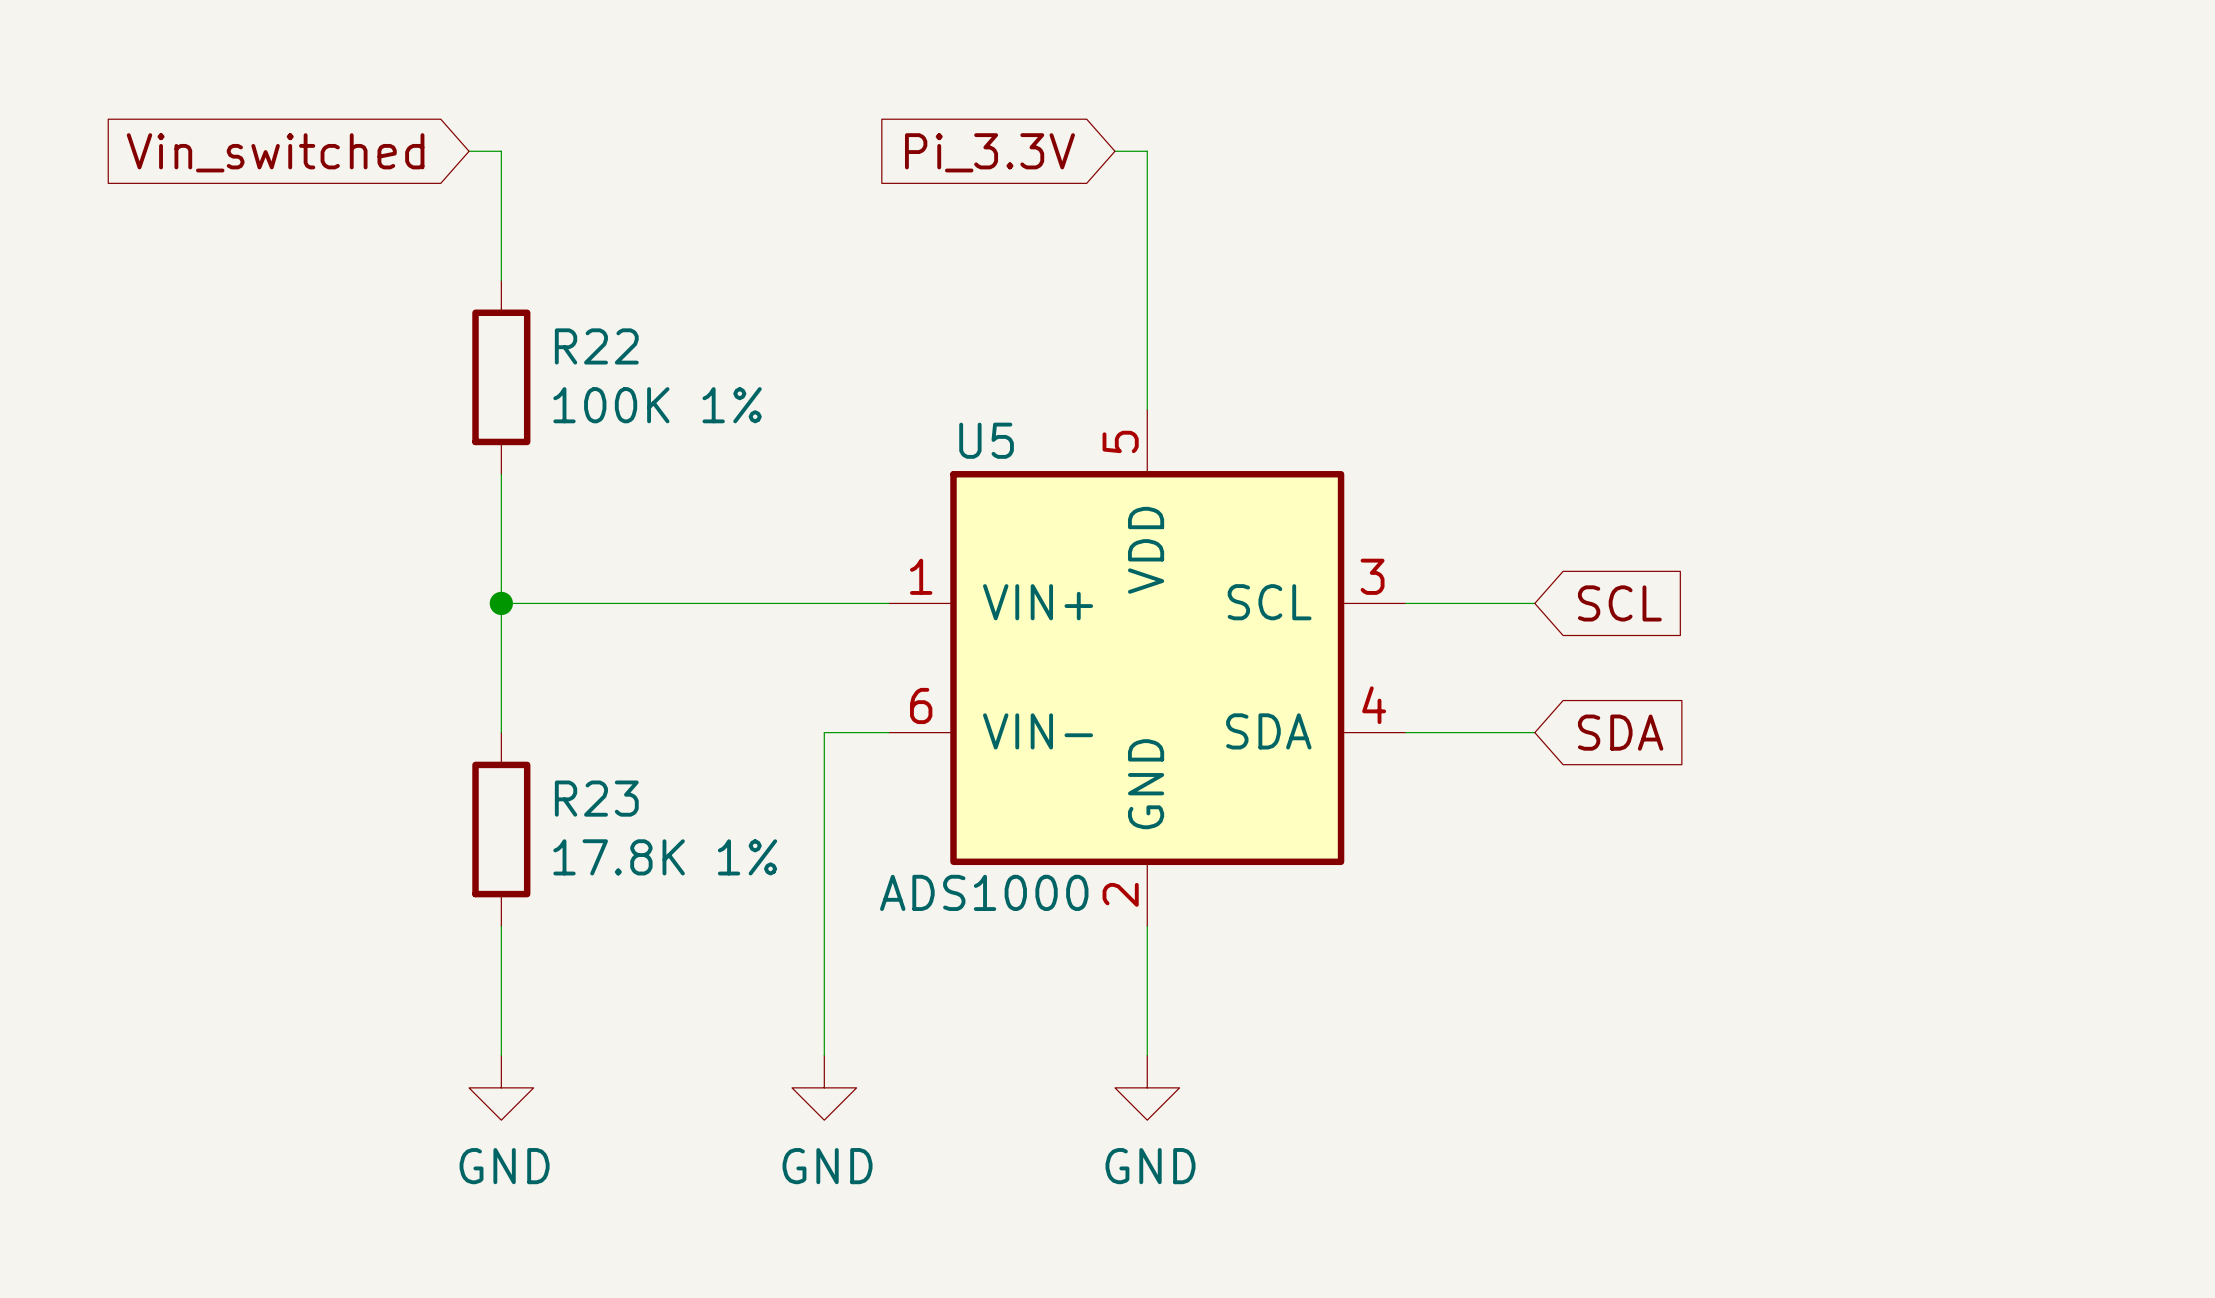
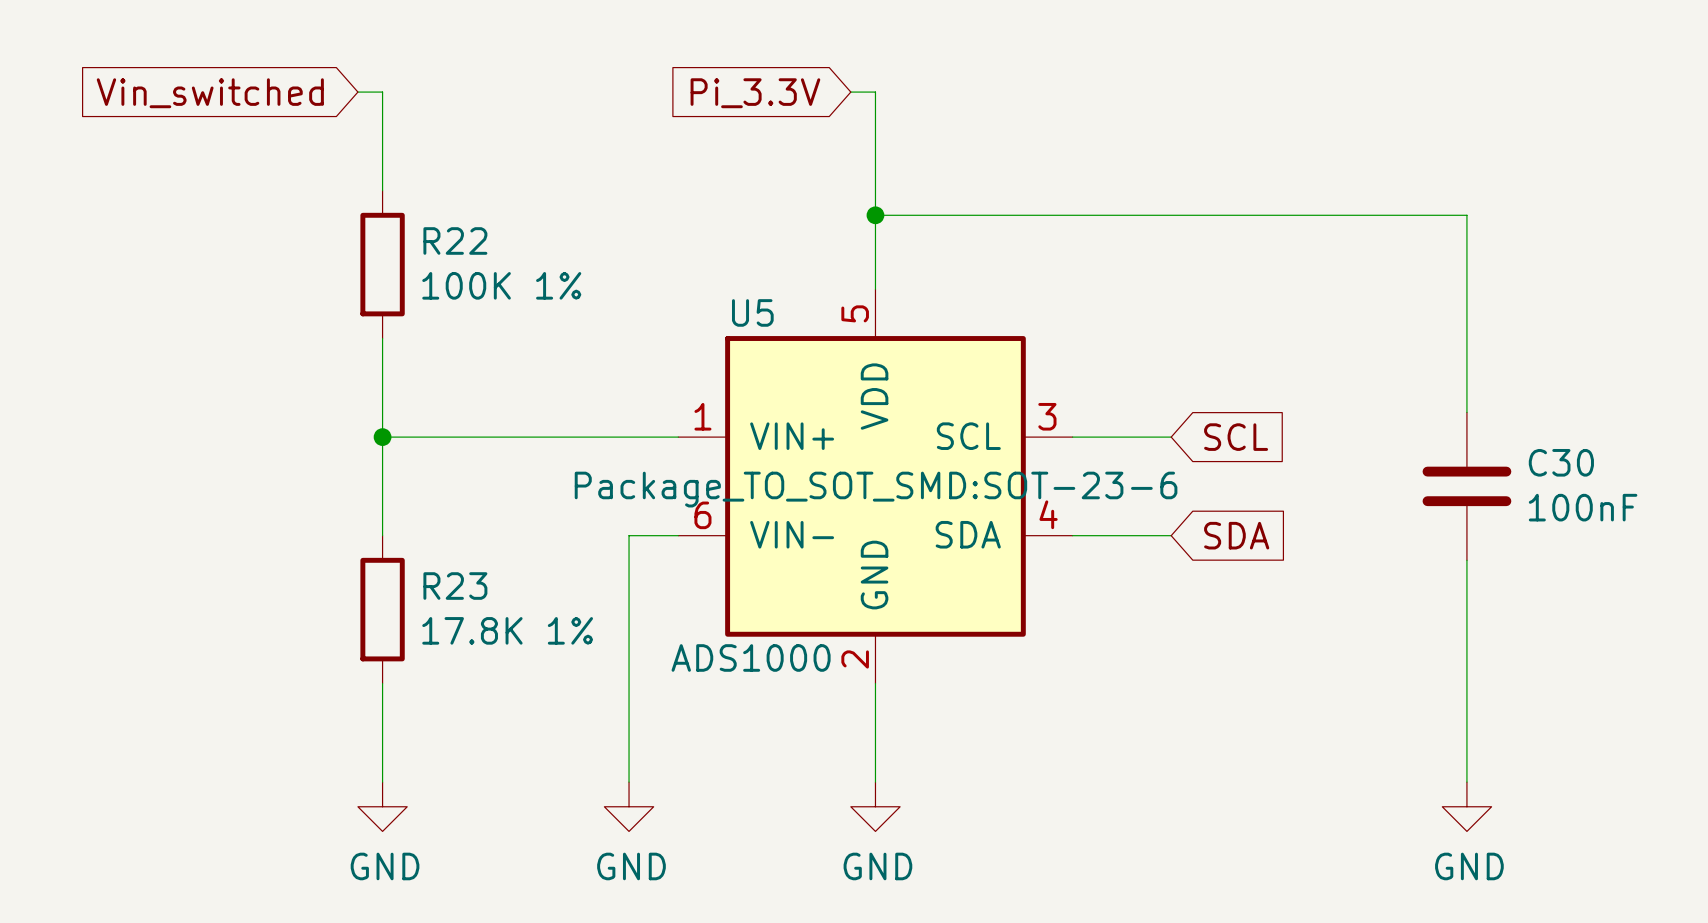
wire: none -> (875, 215) (1466, 215) (1466, 412)
junction: none -> (875, 215)
C30: none -> 100nF (1466, 486)
U5 text: none -> Package_TO_SOT_SMD:SOT-23-6 (876, 489)
wire: none -> (1466, 560) (1466, 782)
power symbol: none -> GND (1466, 806)

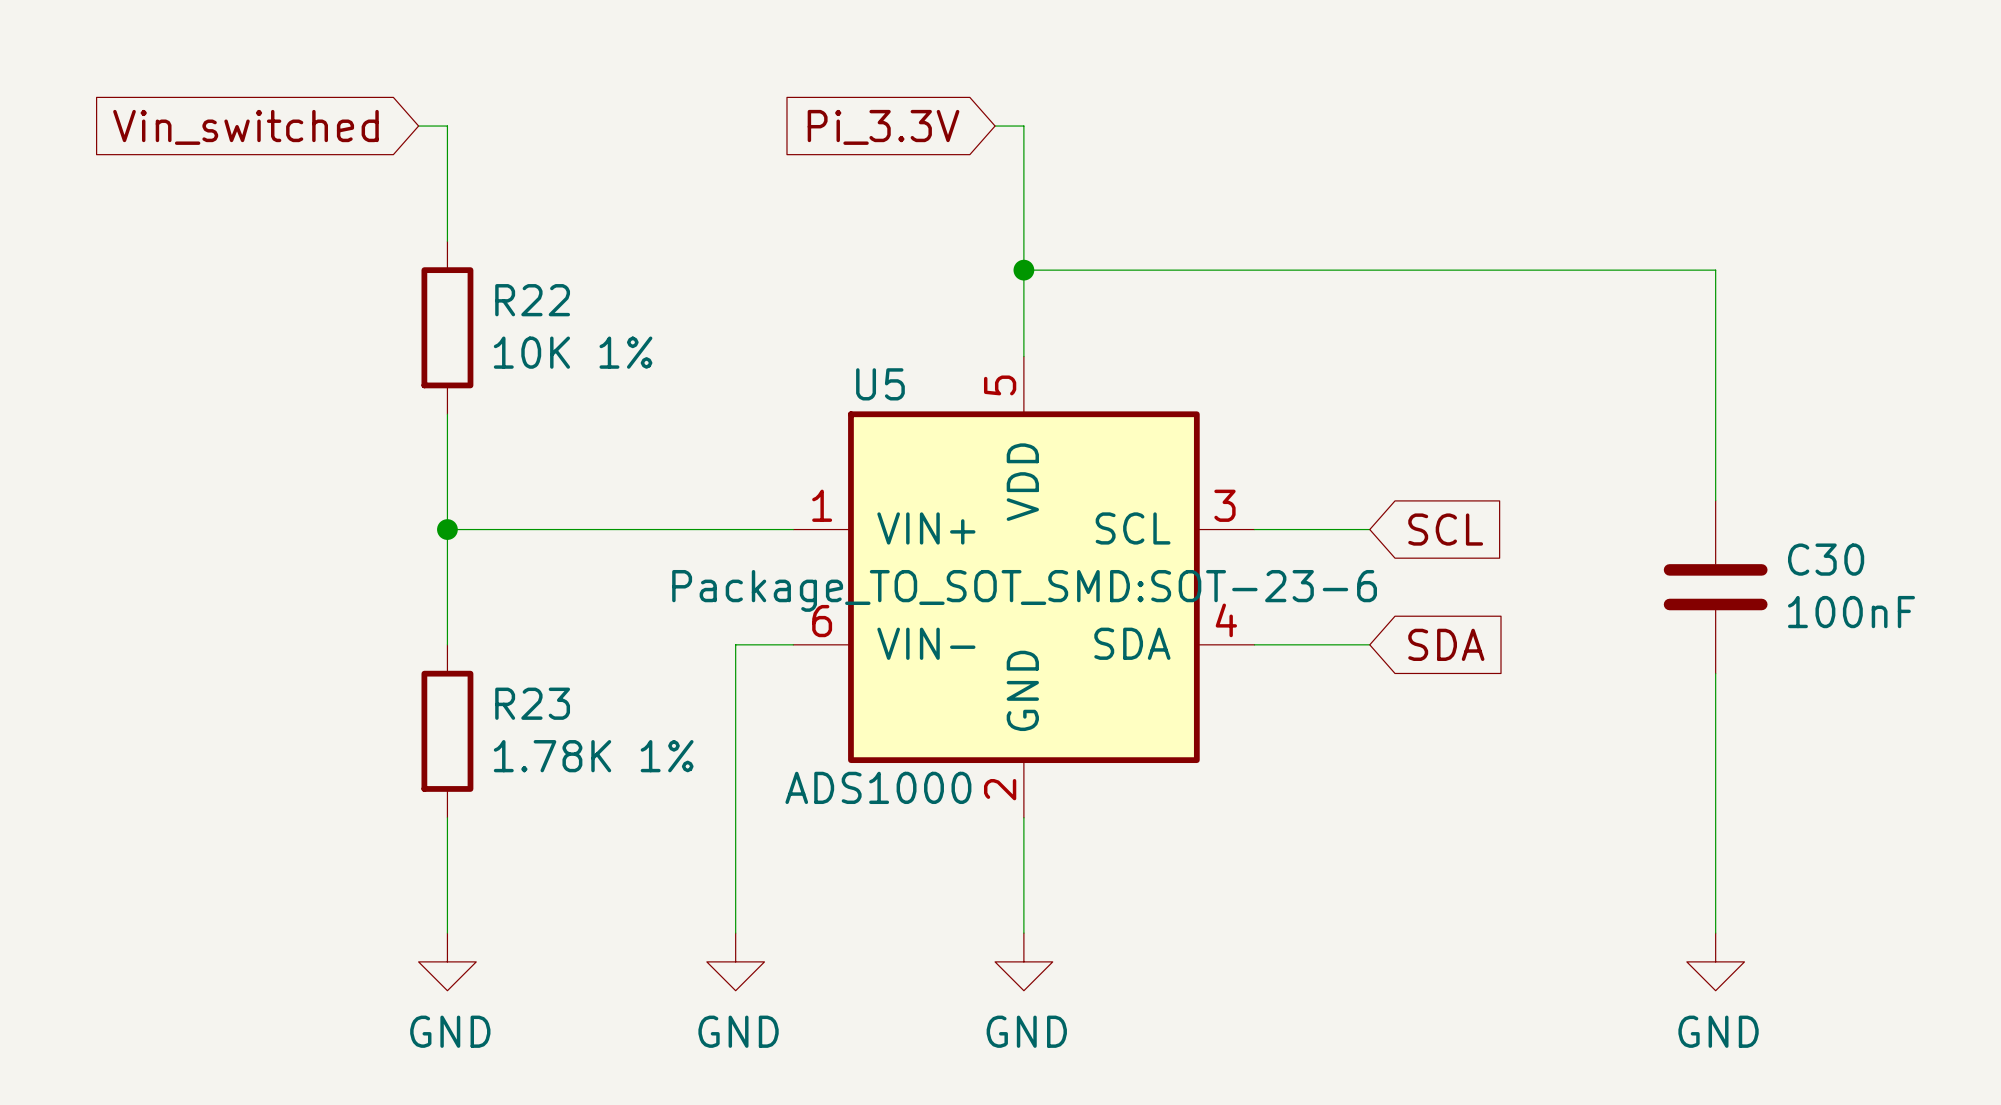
R22 value: 100K 1% (501, 285) -> 10K 1% (573, 352)
R23 value: 17.8K 1% (507, 630) -> 1.78K 1% (593, 756)

